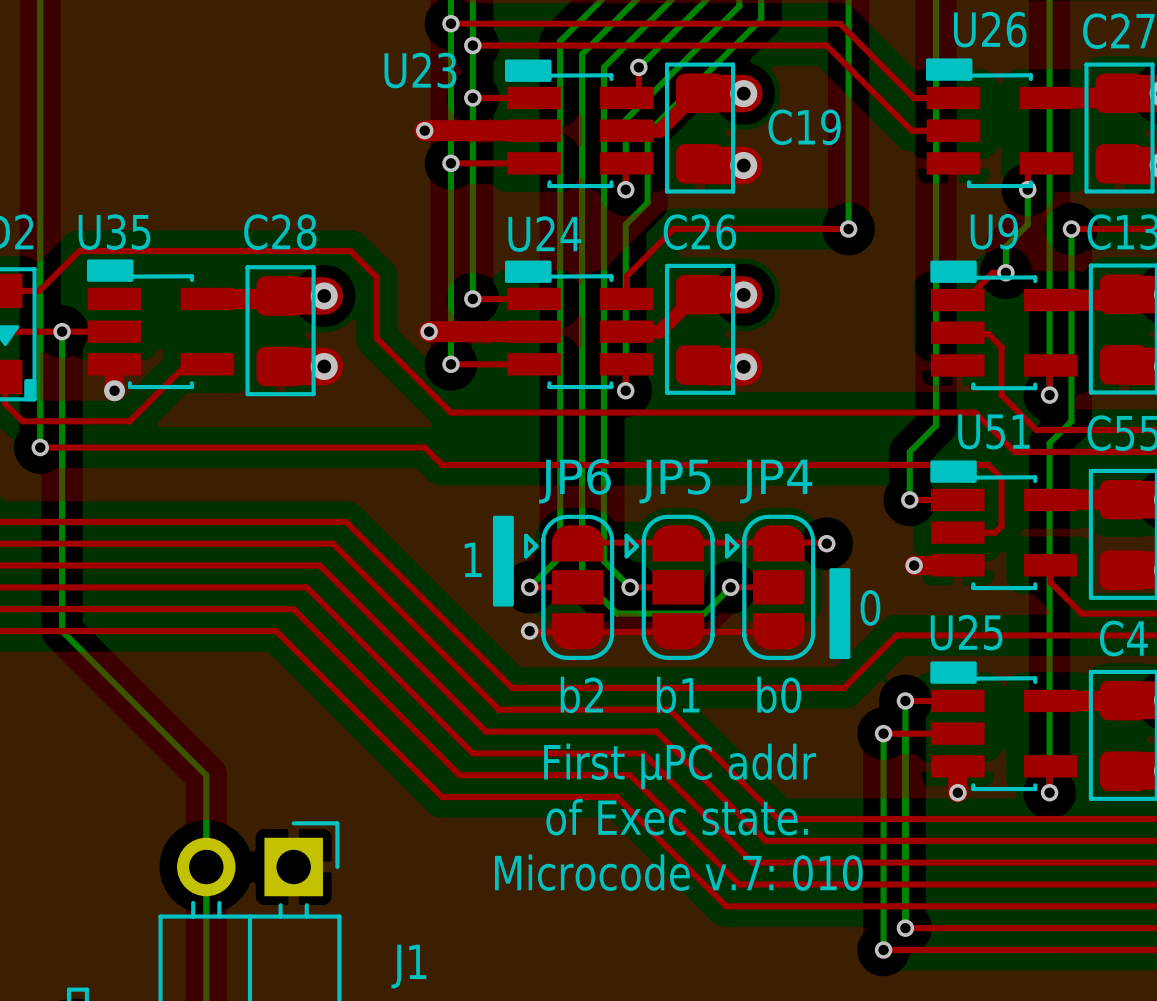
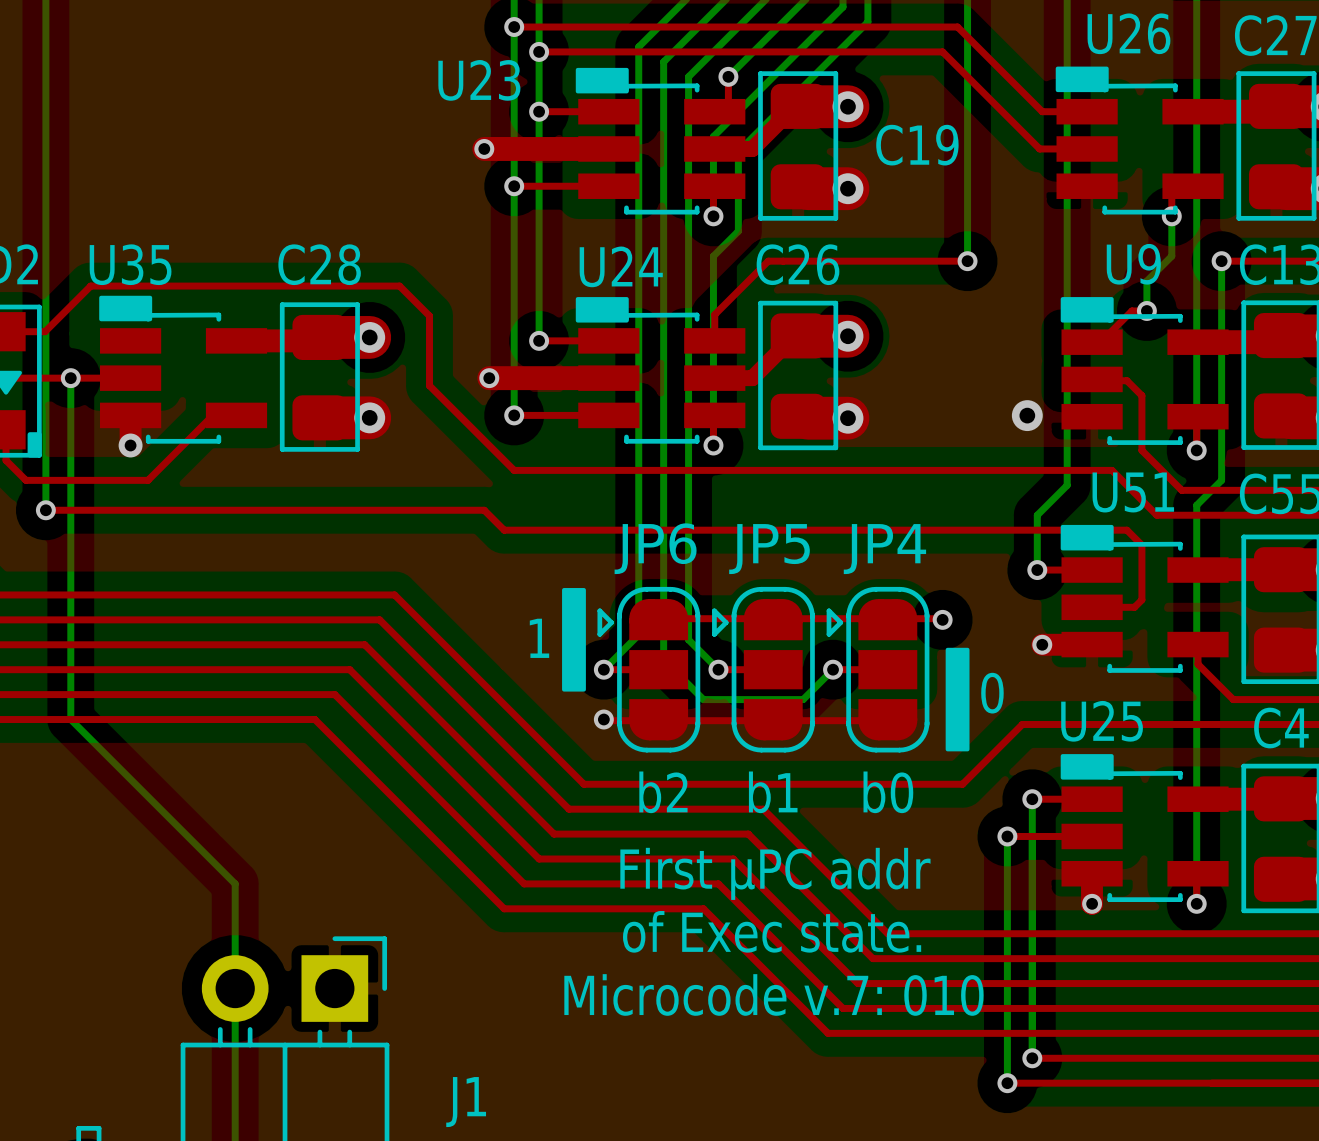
via: none -> (1027, 415)

